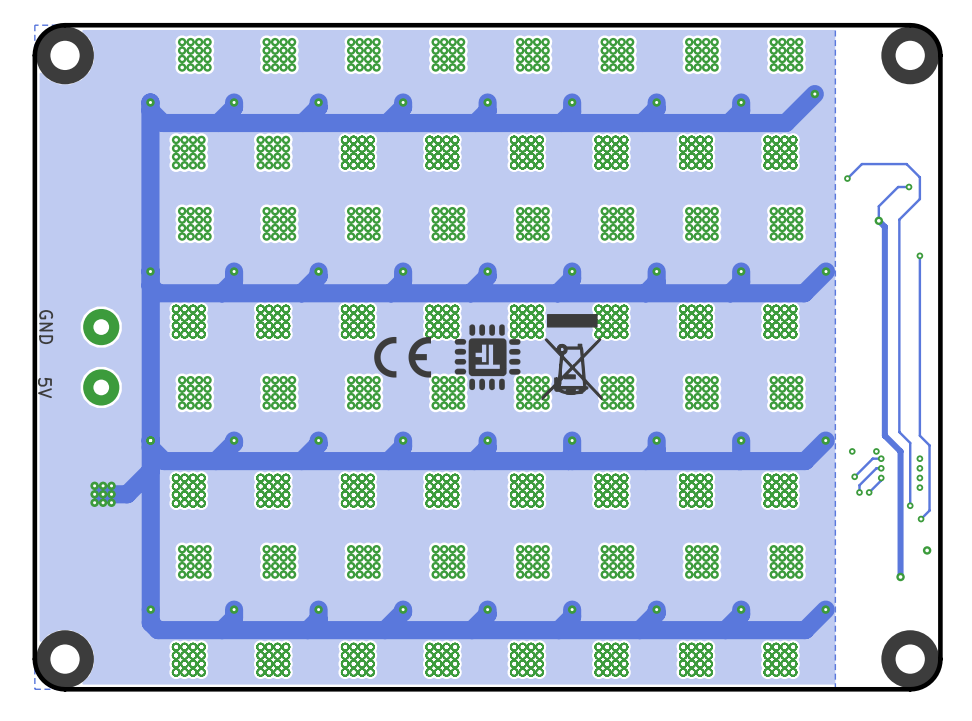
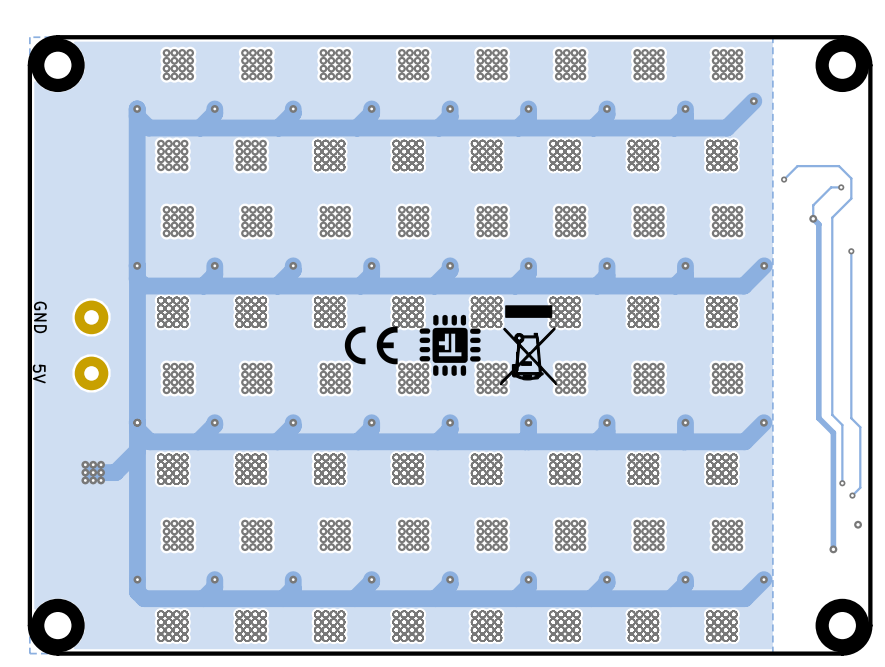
via: (852, 451) -> none
via: (876, 451) -> none
track: (881, 458) (872, 458) (854, 476) -> none
via: (881, 458) -> none
via: (919, 458) -> none
track: (881, 468) (876, 468) (859, 485) (859, 492) -> none
via: (881, 468) -> none
via: (919, 468) -> none
via: (854, 476) -> none
track: (881, 477) (881, 480) (869, 492) -> none
via: (881, 477) -> none
via: (919, 477) -> none
via: (919, 487) -> none
via: (859, 492) -> none
via: (869, 492) -> none

